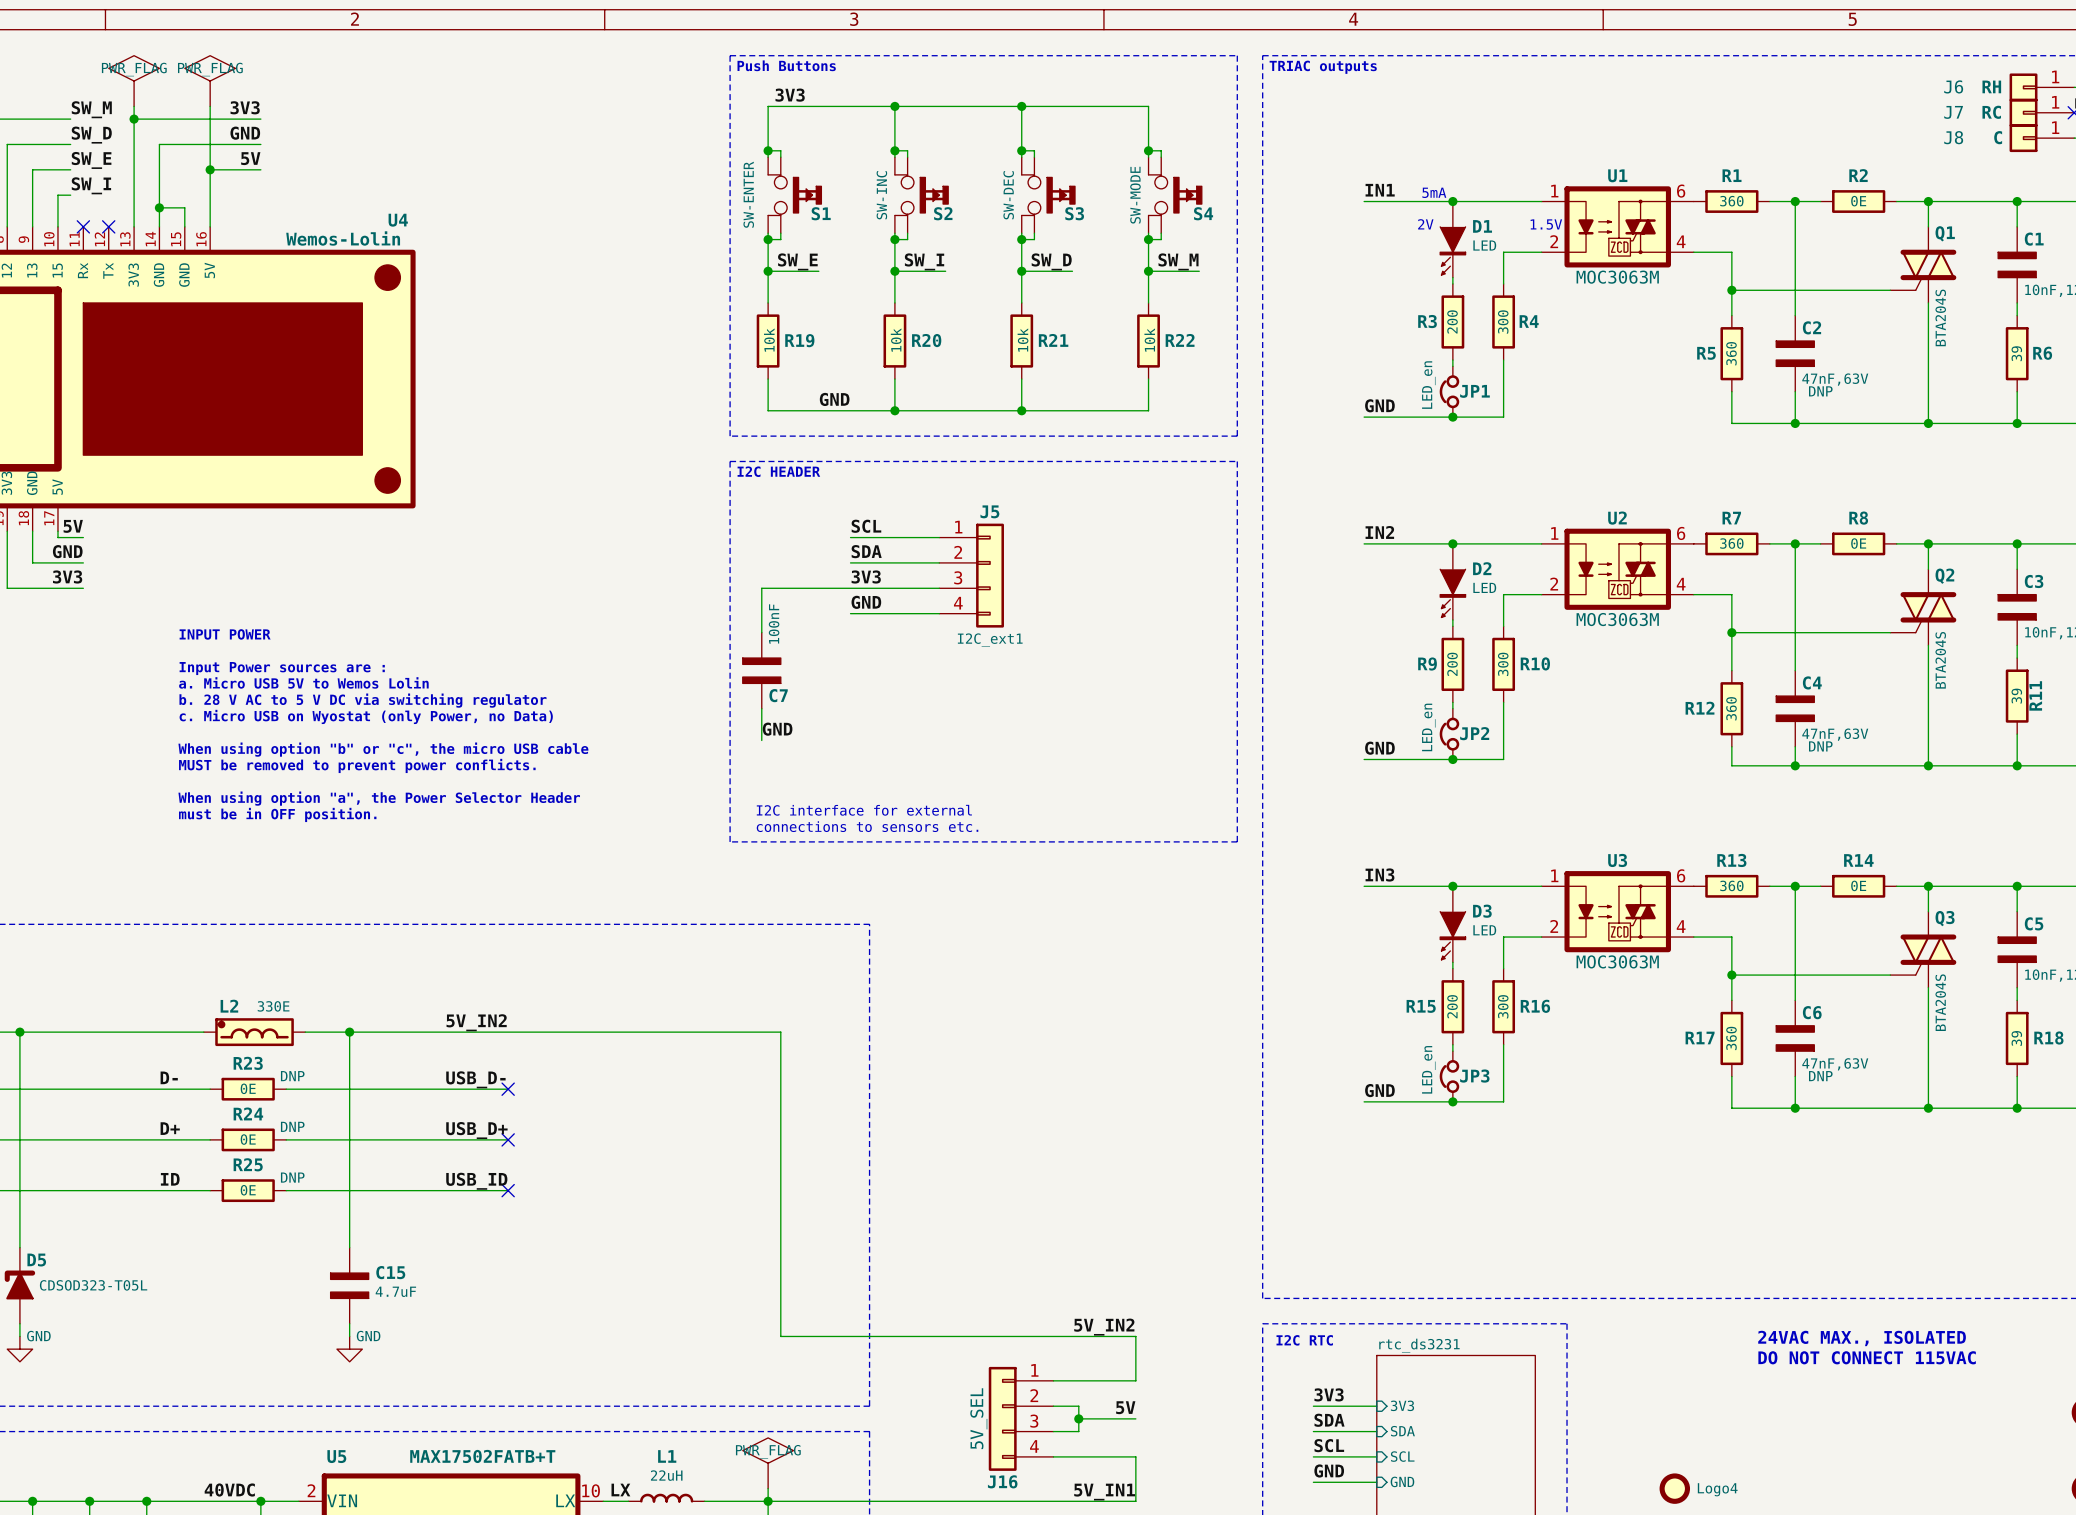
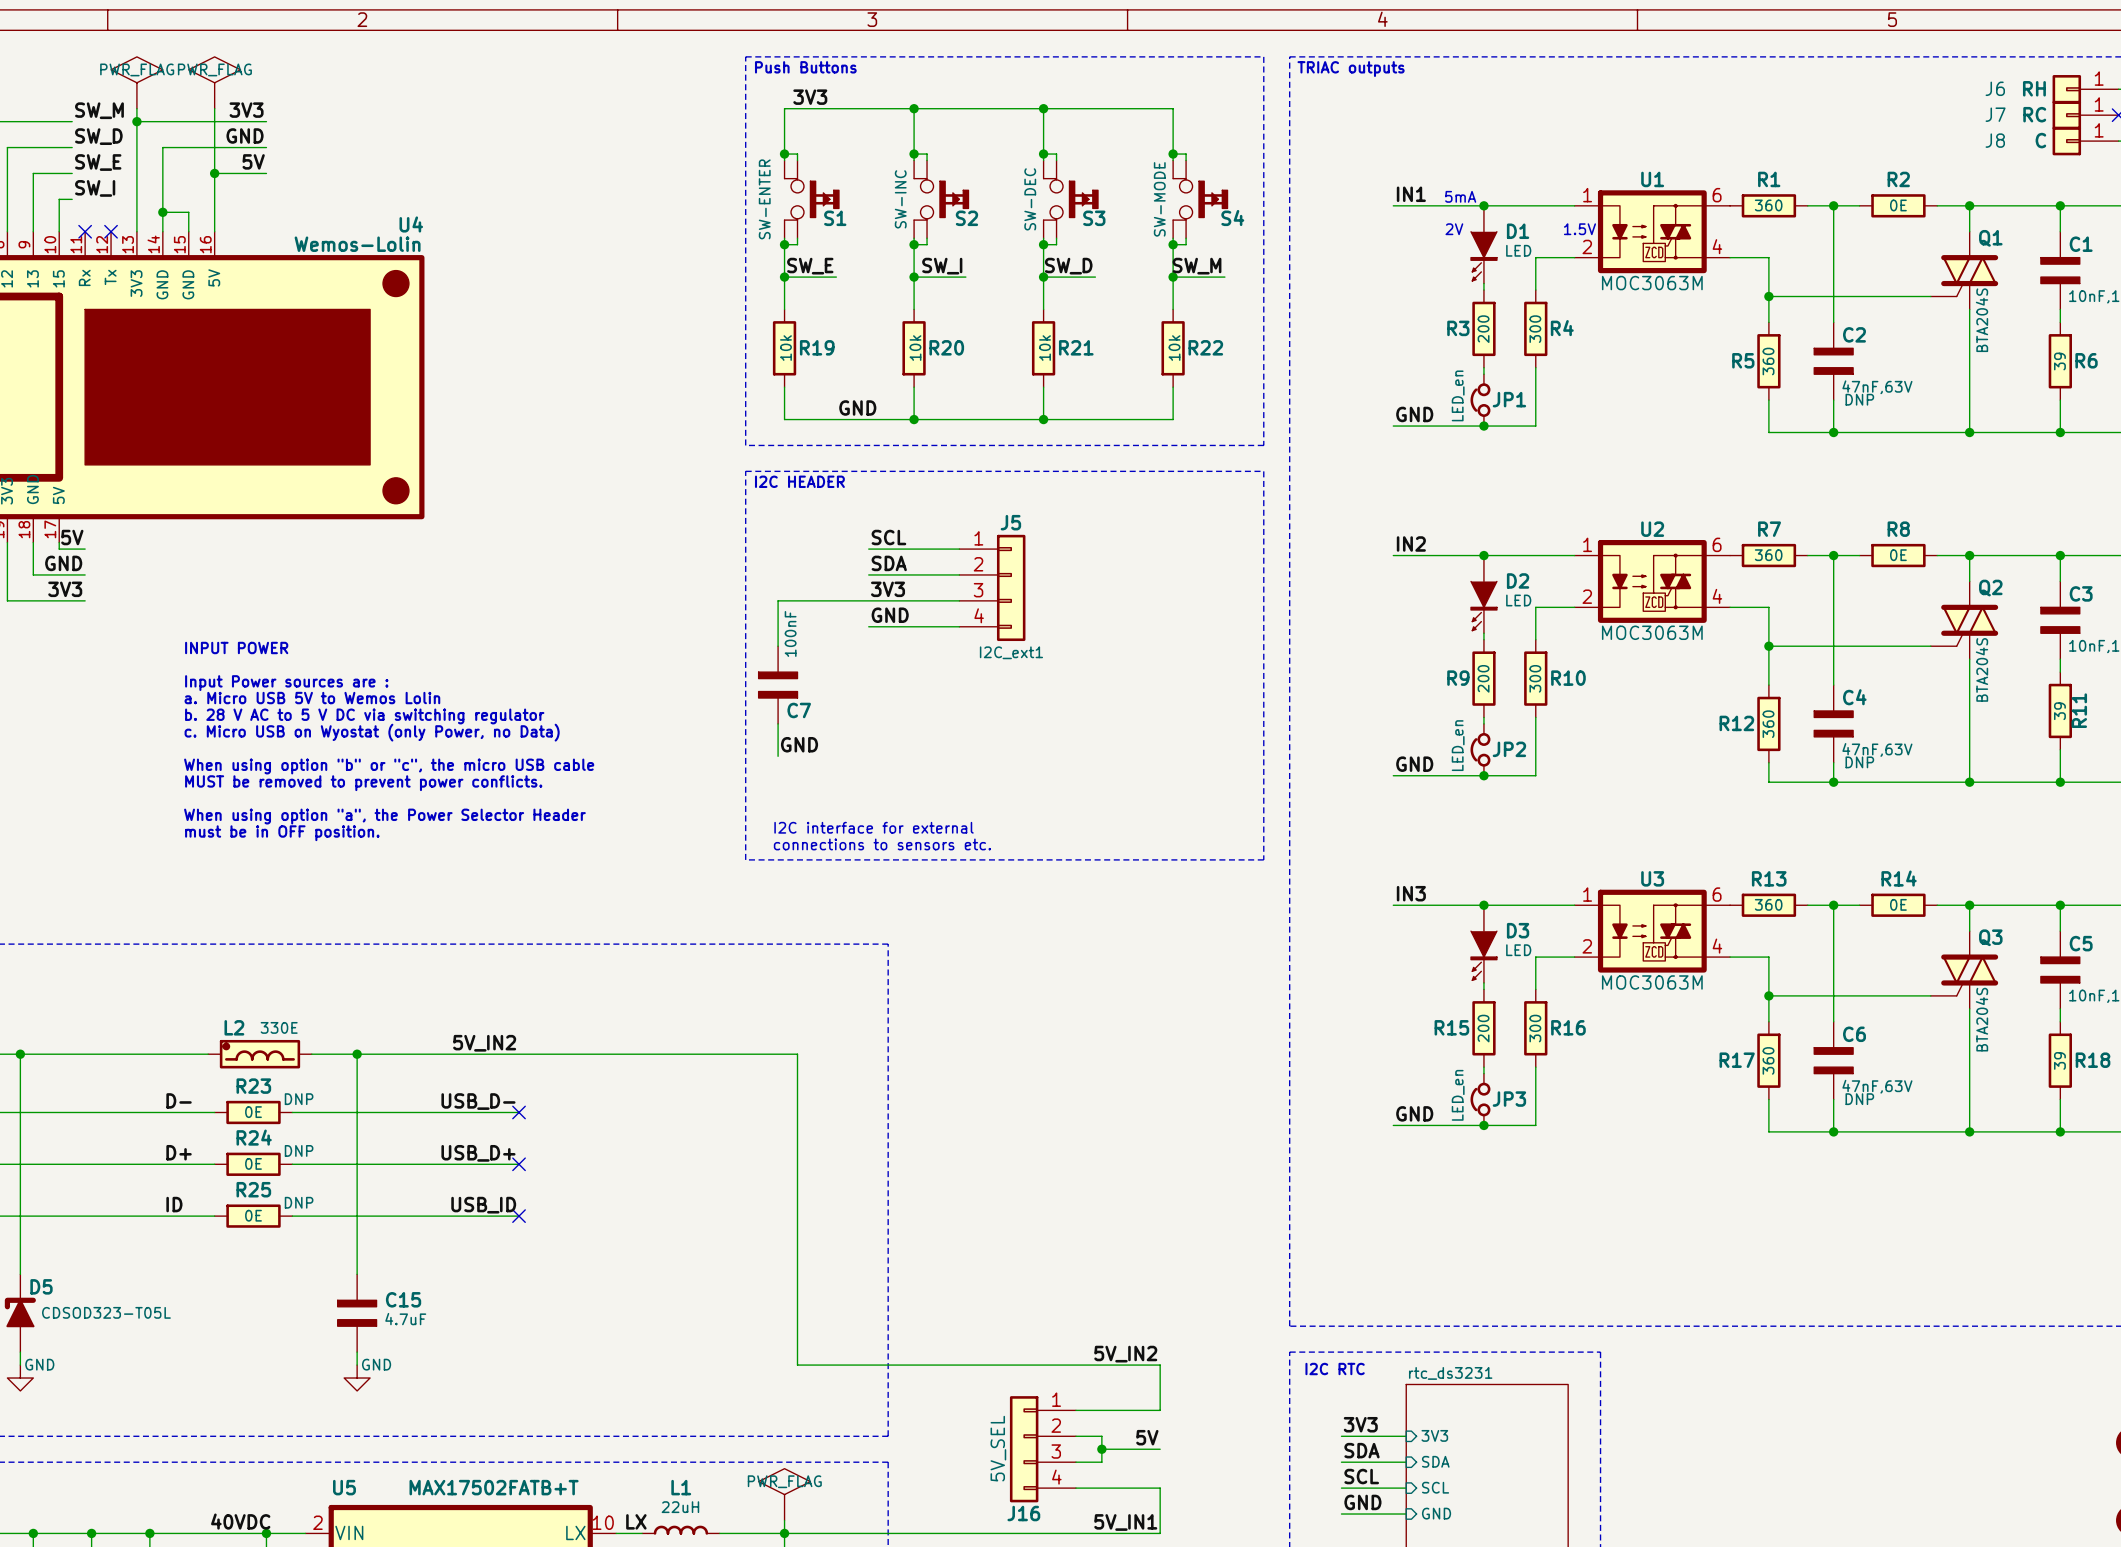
text: 24VAC MAX., ISOLATED (1862, 1338) -> none
text: DO NOT CONNECT 115VAC (1867, 1357) -> none
Logo4: (1674, 1488) -> none

